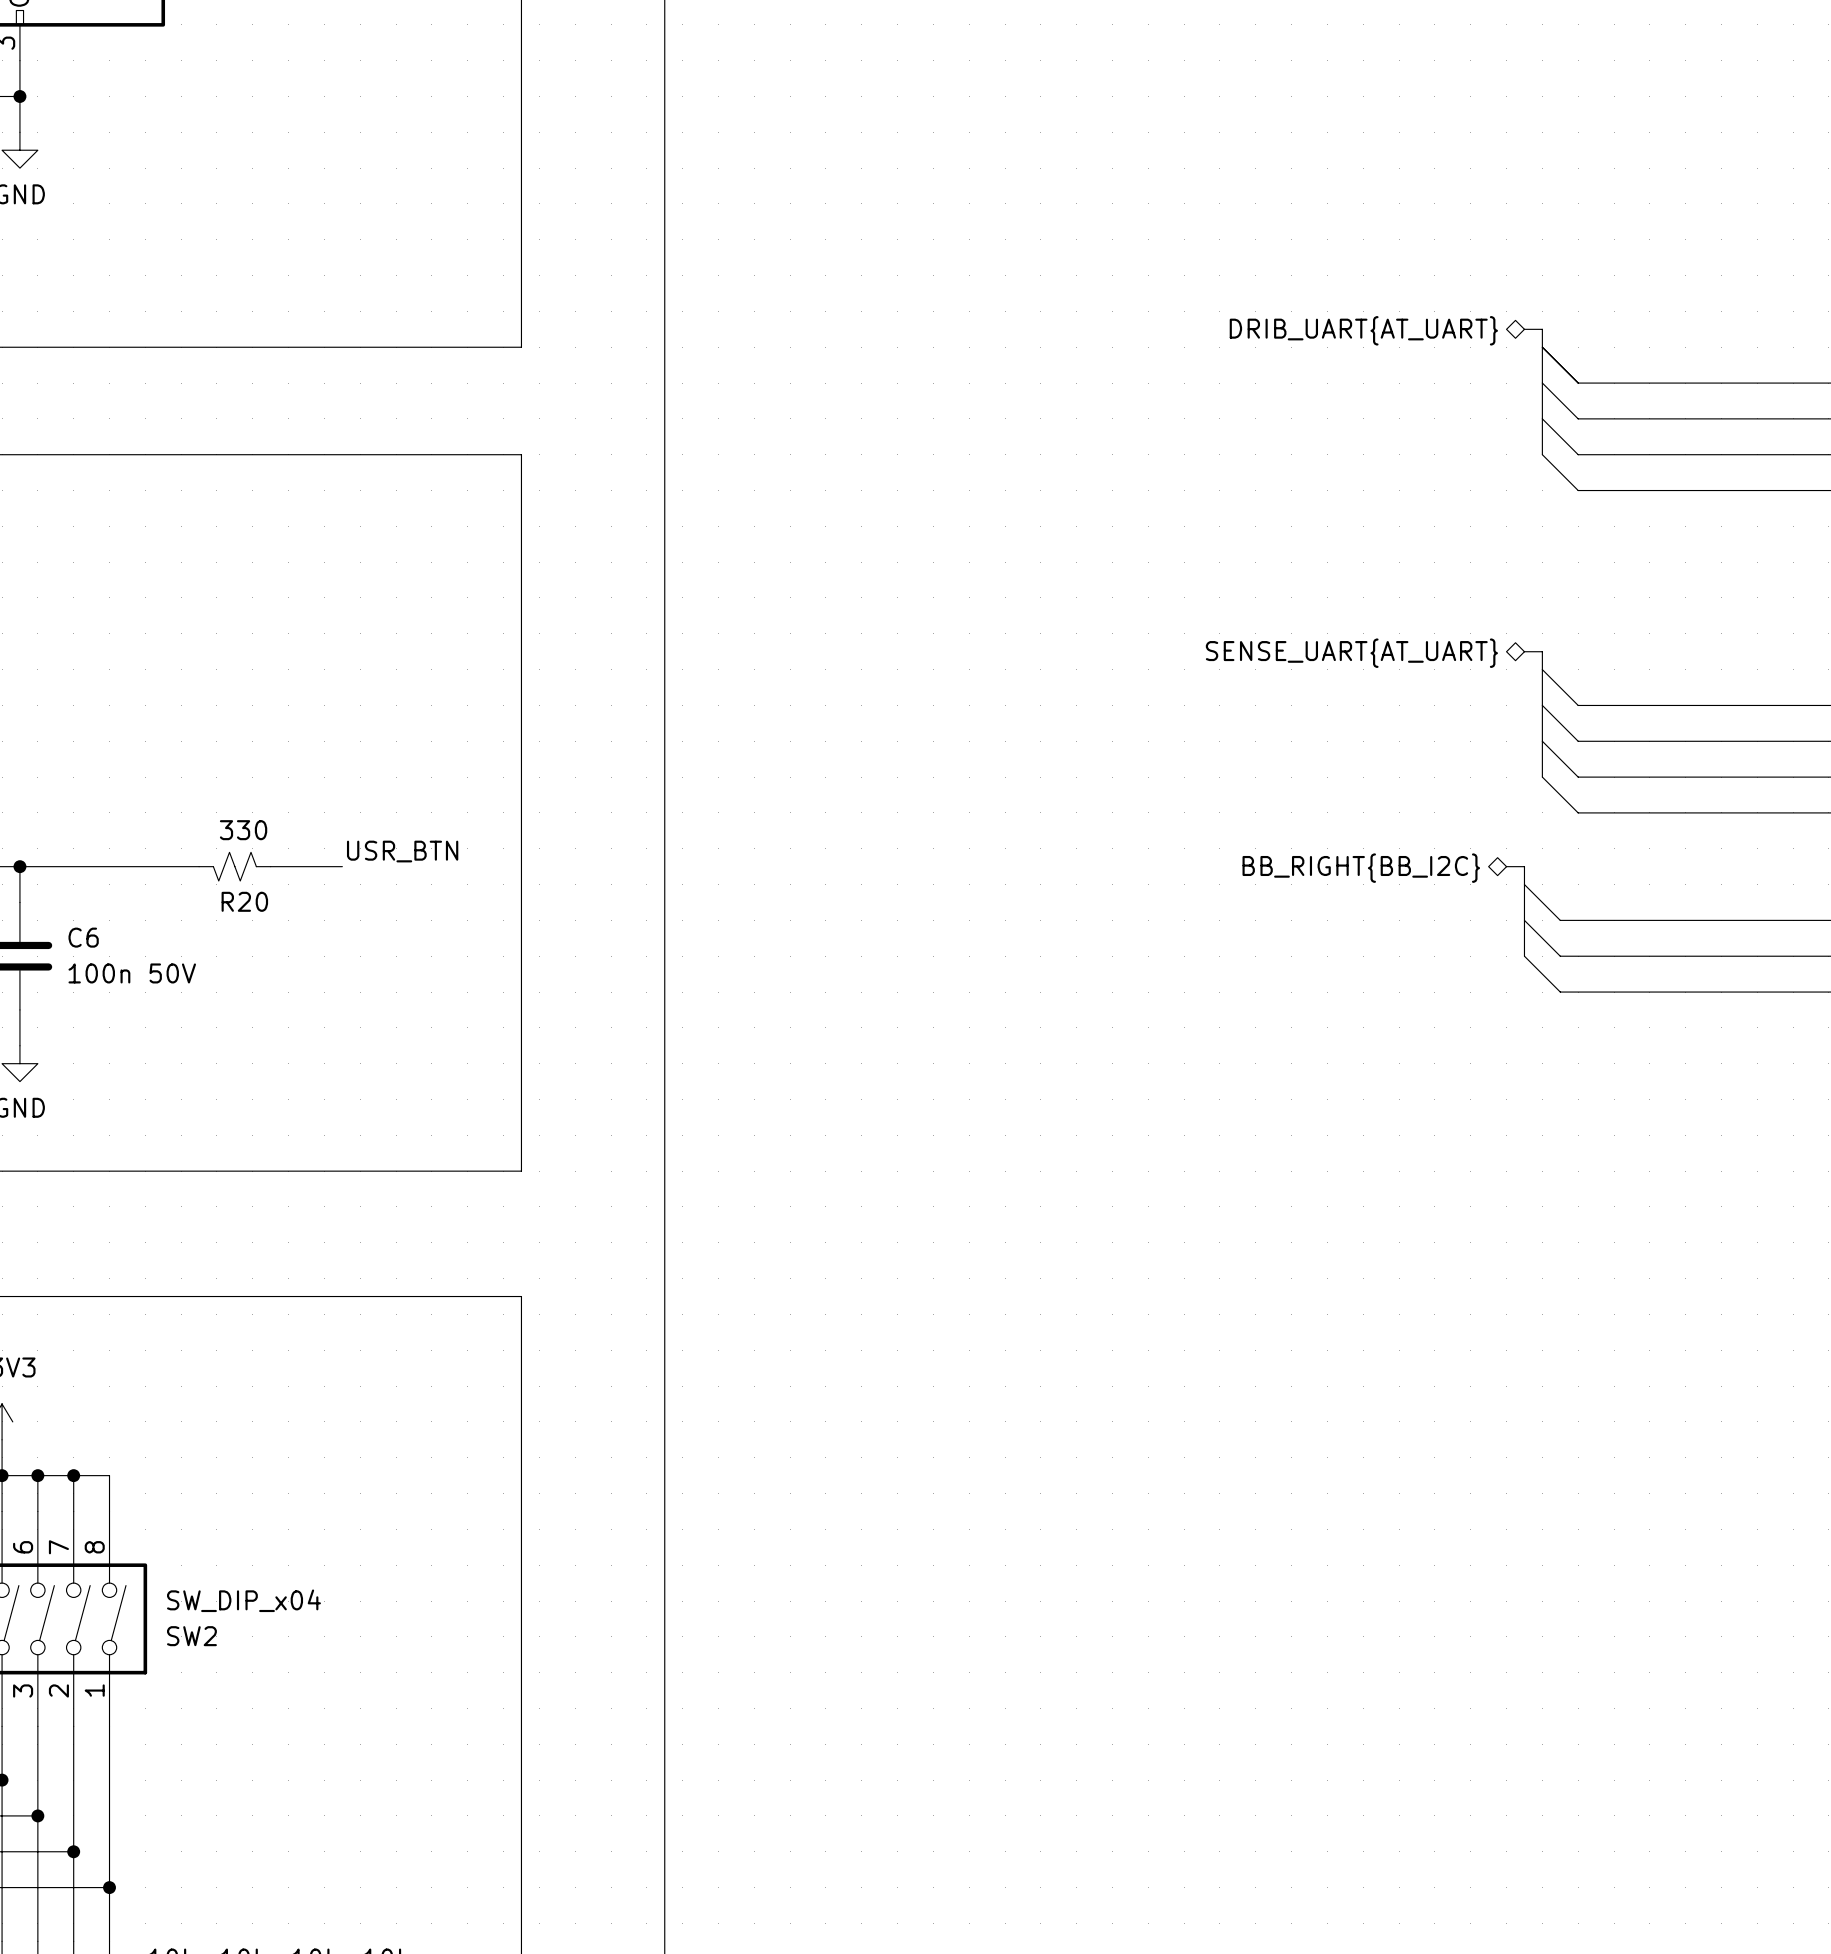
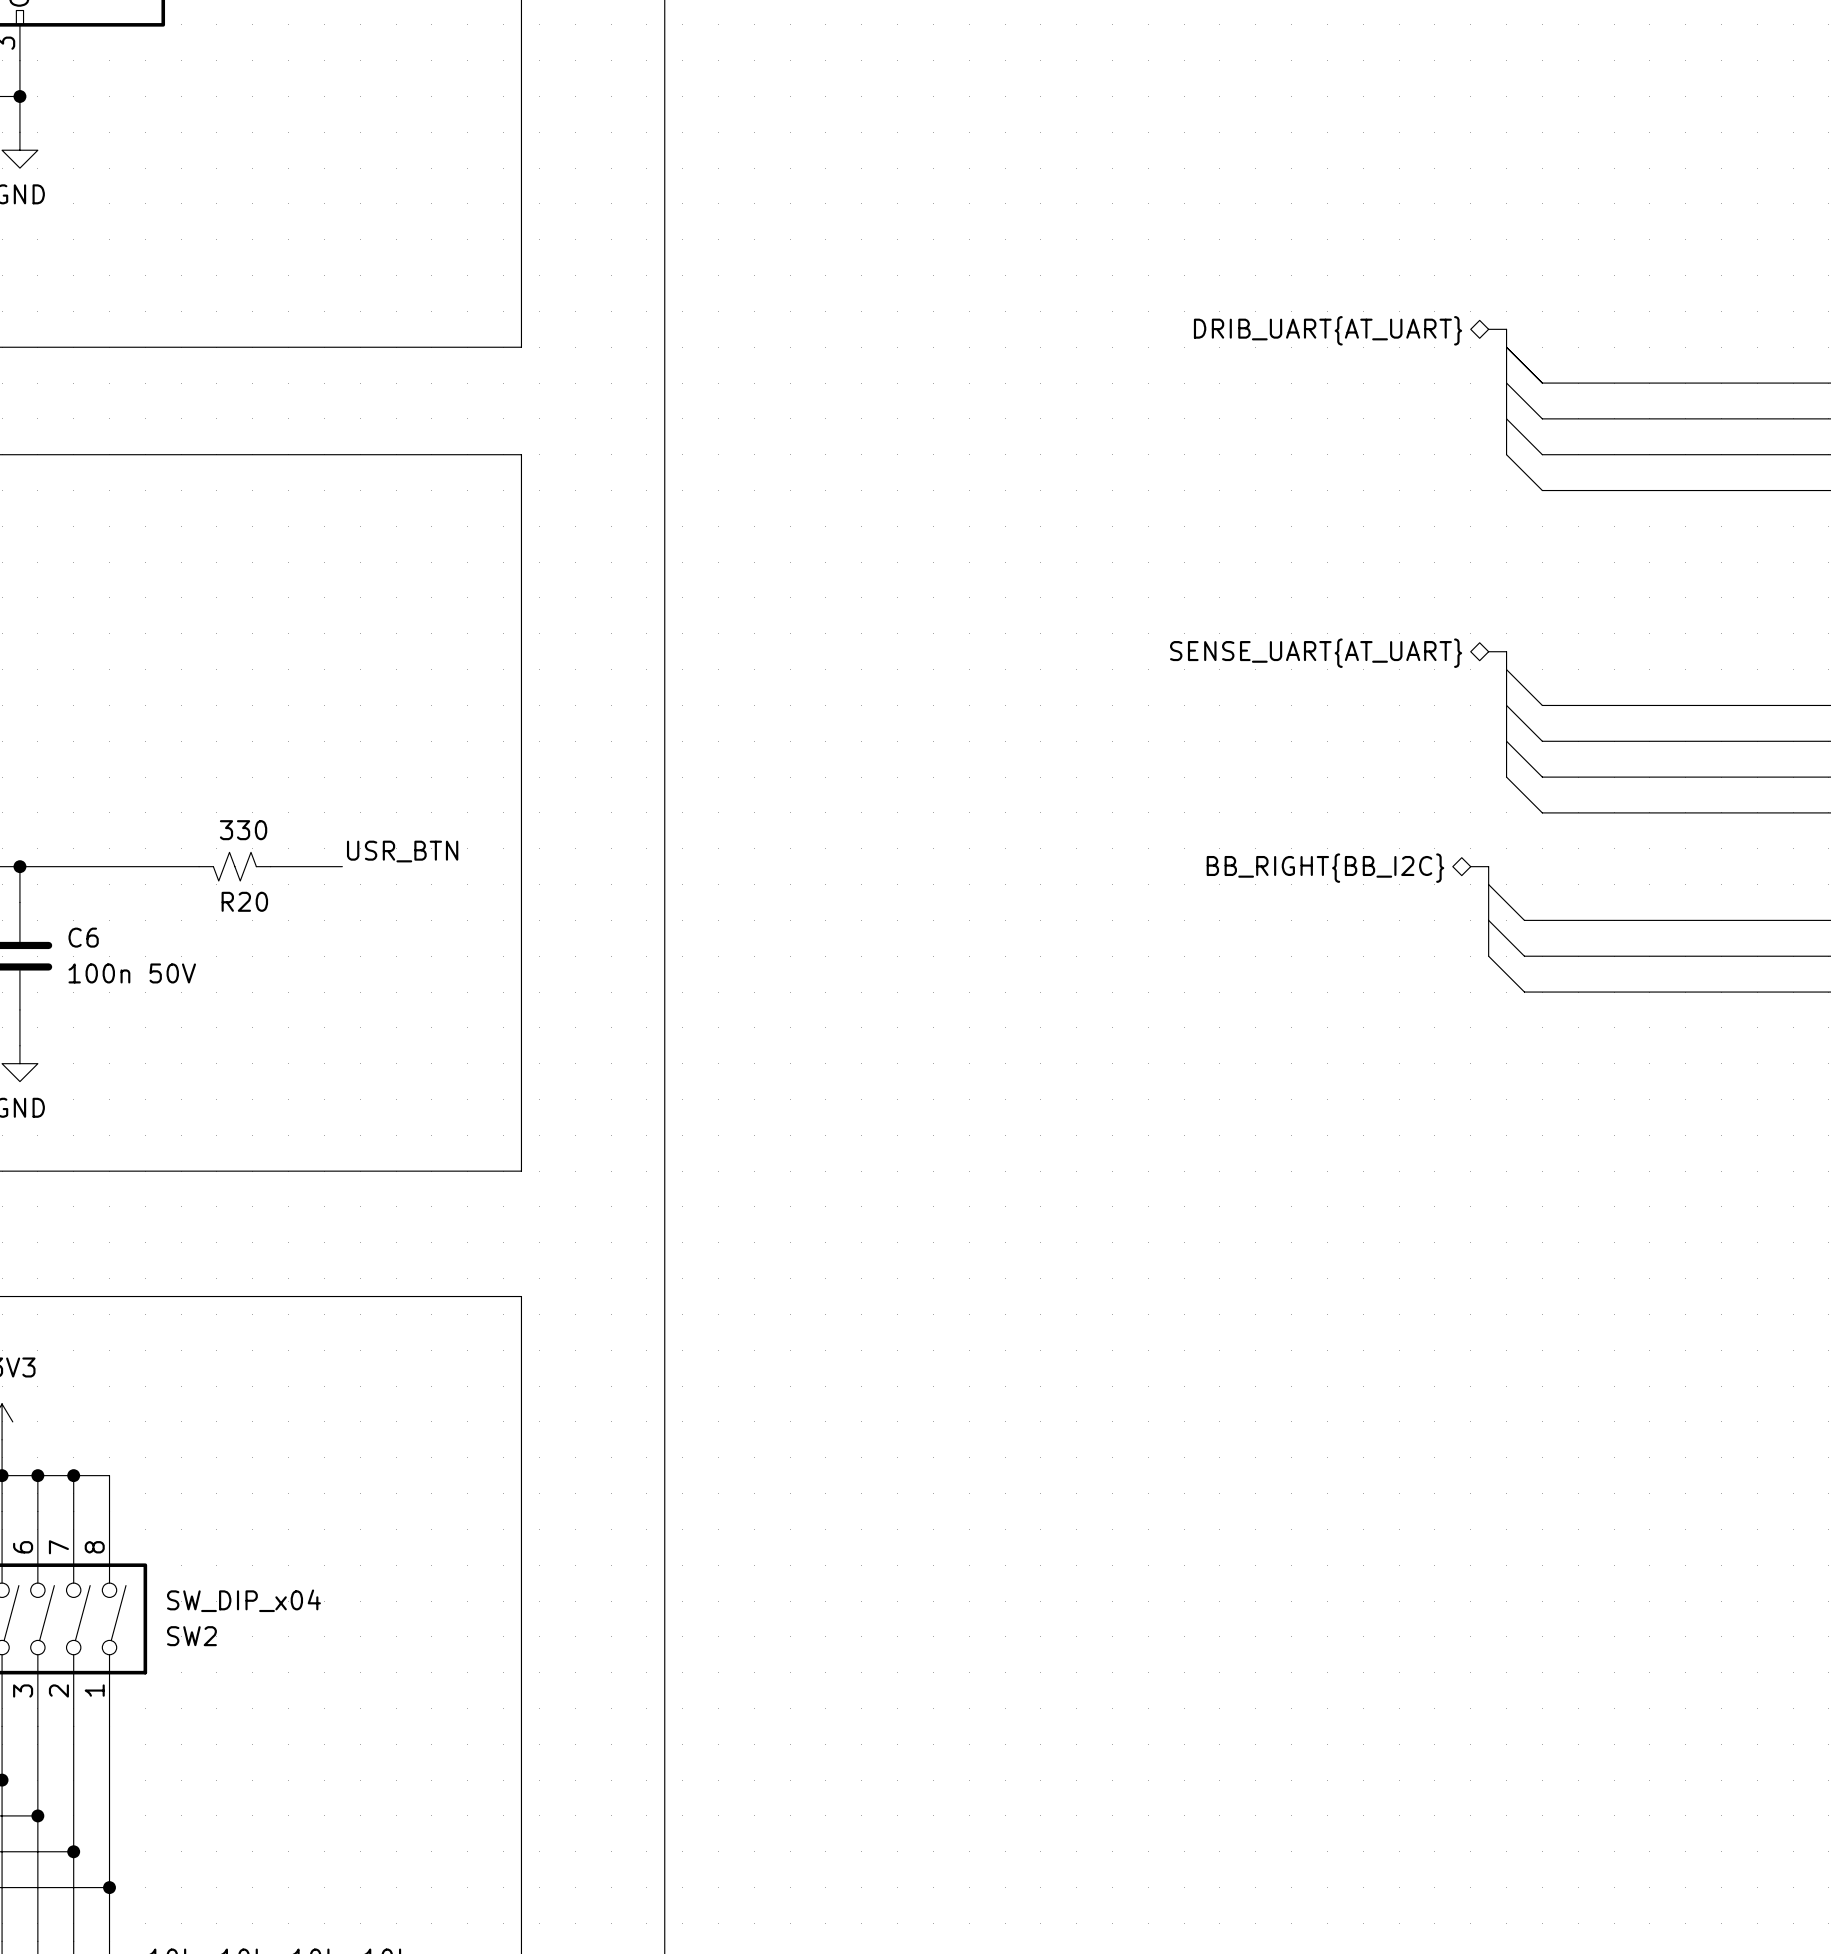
bus: (1524, 329) (1542, 329) (1542, 454) -> (1488, 329) (1506, 329) (1506, 454)
hierarchical label position: DRIB_UART{AT_UART} (1363, 330) -> DRIB_UART{AT_UART} (1328, 330)
wire: (1542, 347) (1578, 383) -> (1506, 347) (1542, 383) (1578, 383)
wire: (1542, 383) (1578, 418) -> (1506, 383) (1542, 418) (1578, 418)
wire: (1542, 418) (1578, 454) -> (1506, 418) (1542, 454) (1578, 454)
wire: (1542, 454) (1578, 490) -> (1506, 454) (1542, 490) (1578, 490)
bus: (1524, 651) (1542, 651) (1542, 777) -> (1488, 651) (1506, 651) (1506, 777)
hierarchical label position: SENSE_UART{AT_UART} (1351, 653) -> SENSE_UART{AT_UART} (1316, 653)
wire: (1542, 669) (1578, 705) -> (1506, 669) (1542, 705) (1578, 705)
wire: (1542, 705) (1578, 741) -> (1506, 705) (1542, 741) (1578, 741)
wire: (1542, 741) (1578, 777) -> (1506, 741) (1542, 777) (1578, 777)
wire: (1542, 777) (1578, 812) -> (1506, 777) (1542, 812) (1578, 812)
bus: (1506, 866) (1524, 866) (1524, 956) -> (1470, 866) (1488, 866) (1488, 956)
hierarchical label position: BB_RIGHT{BB_I2C} (1361, 868) -> BB_RIGHT{BB_I2C} (1325, 868)
wire: (1524, 884) (1560, 920) -> (1488, 884) (1524, 920) (1560, 920)
wire: (1524, 920) (1560, 956) -> (1488, 920) (1524, 956) (1560, 956)
wire: (1524, 956) (1560, 992) -> (1488, 956) (1524, 992) (1560, 992)

